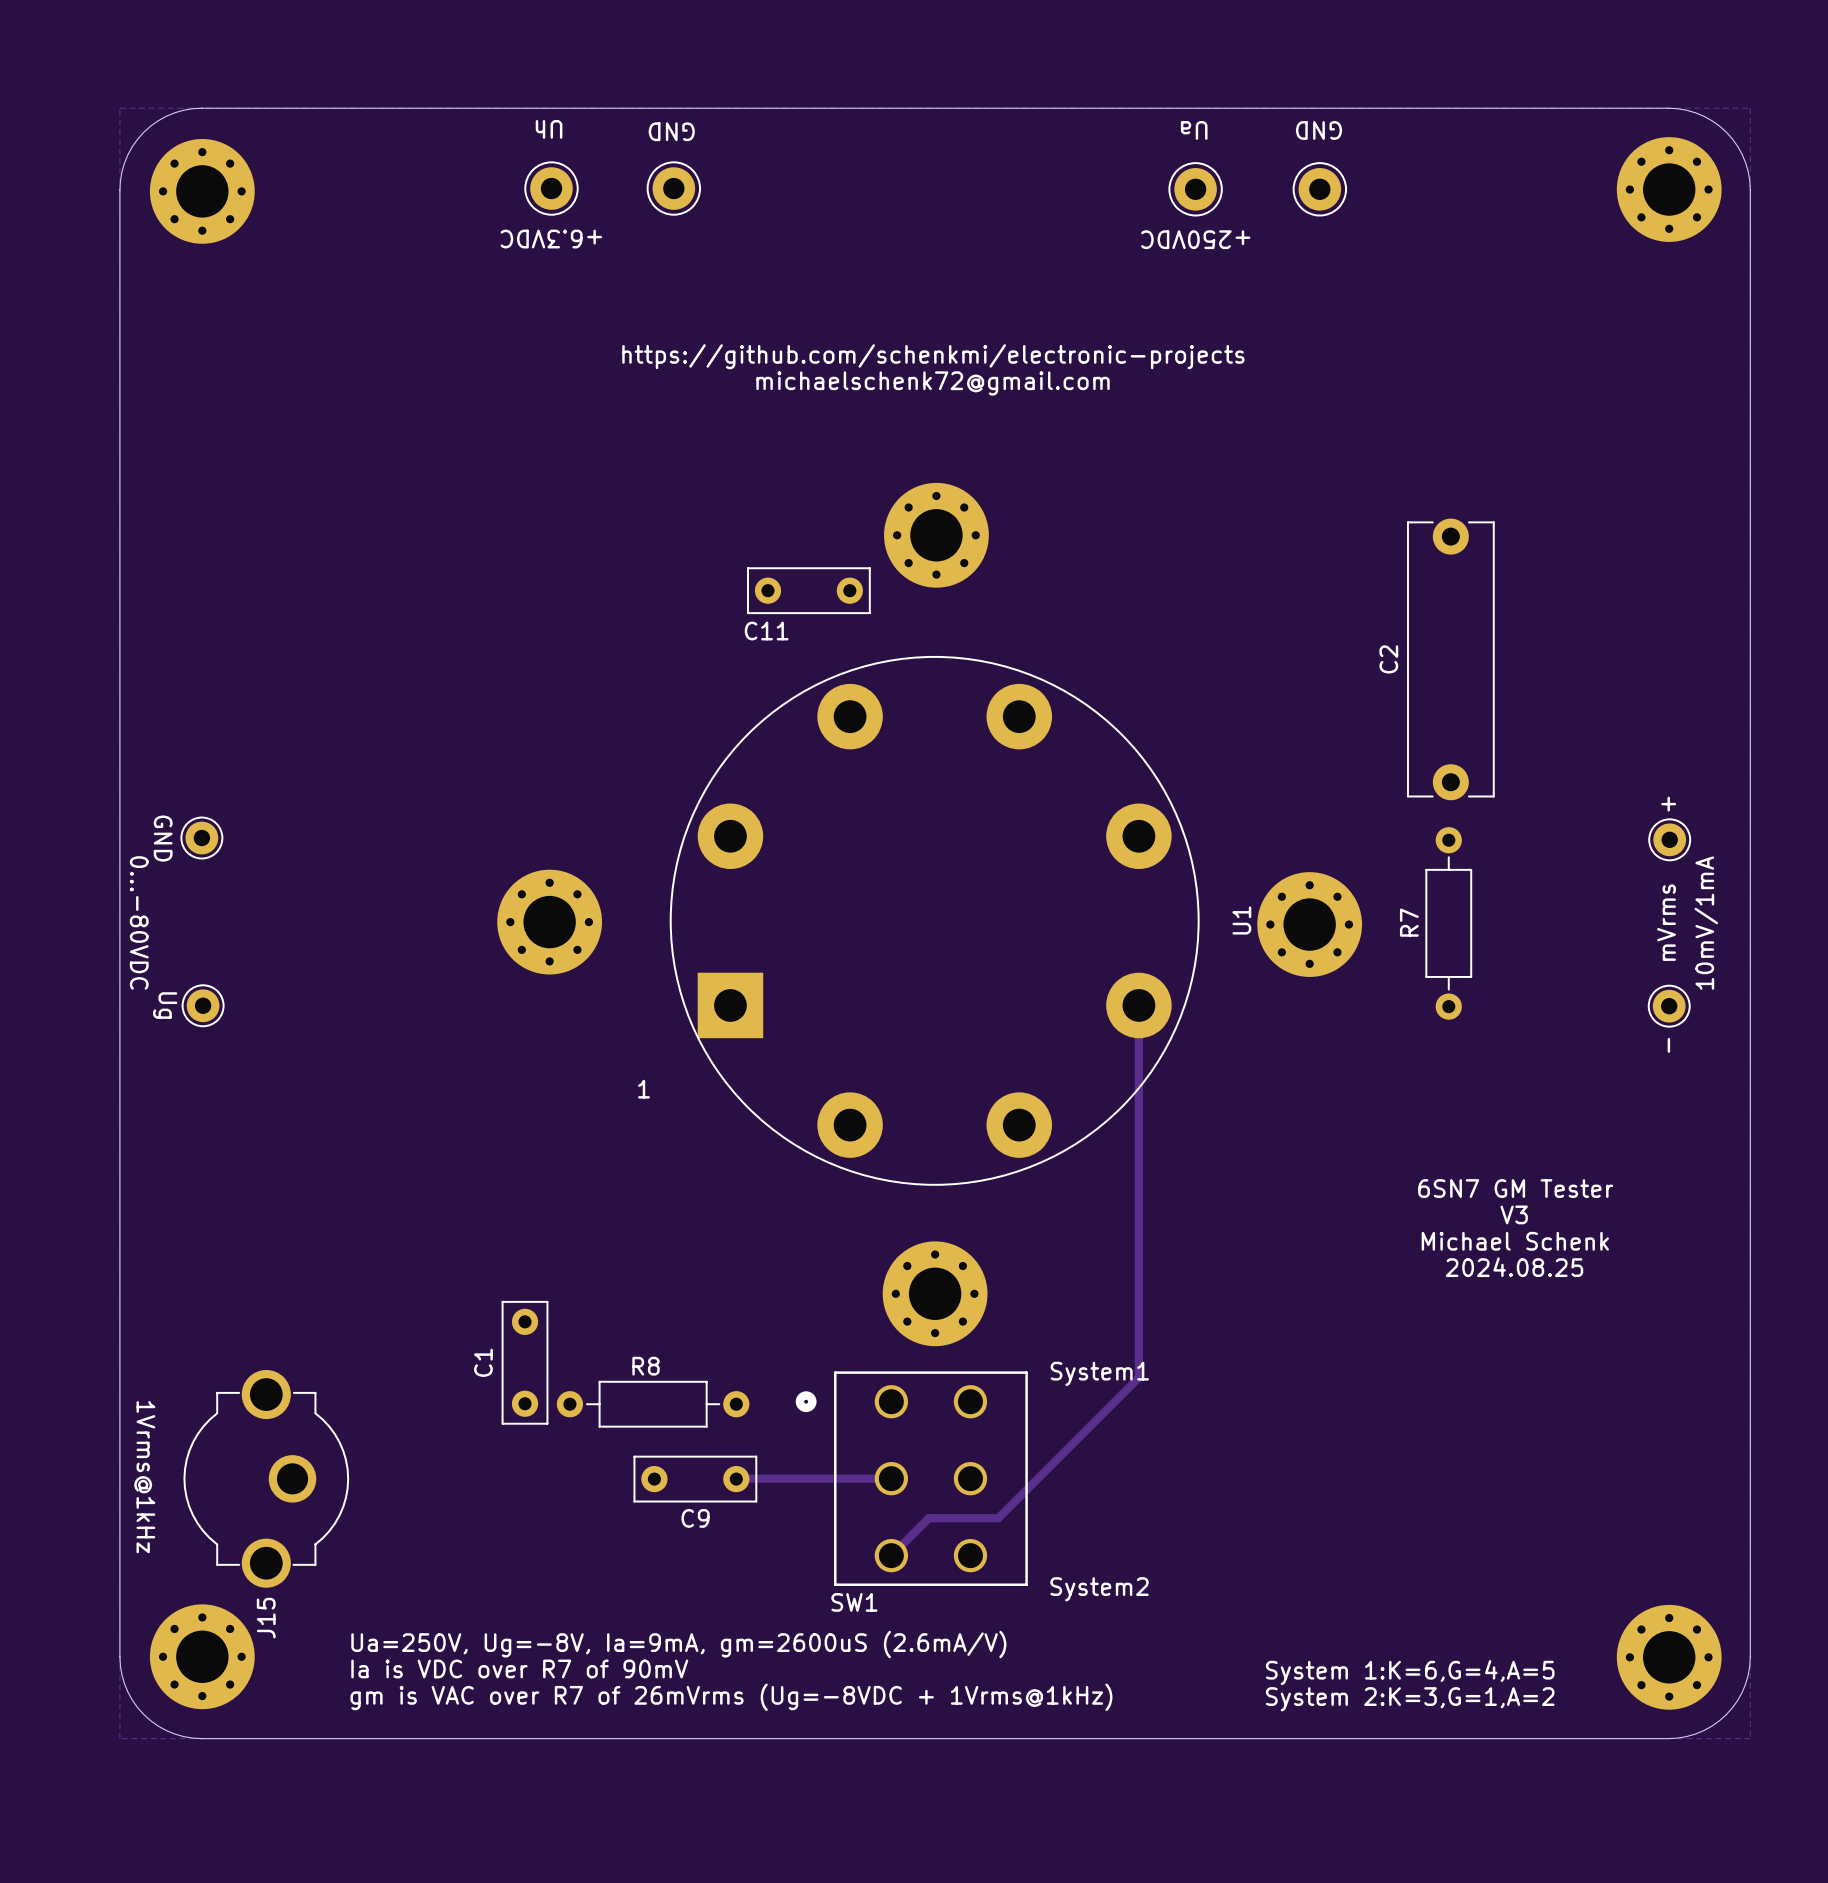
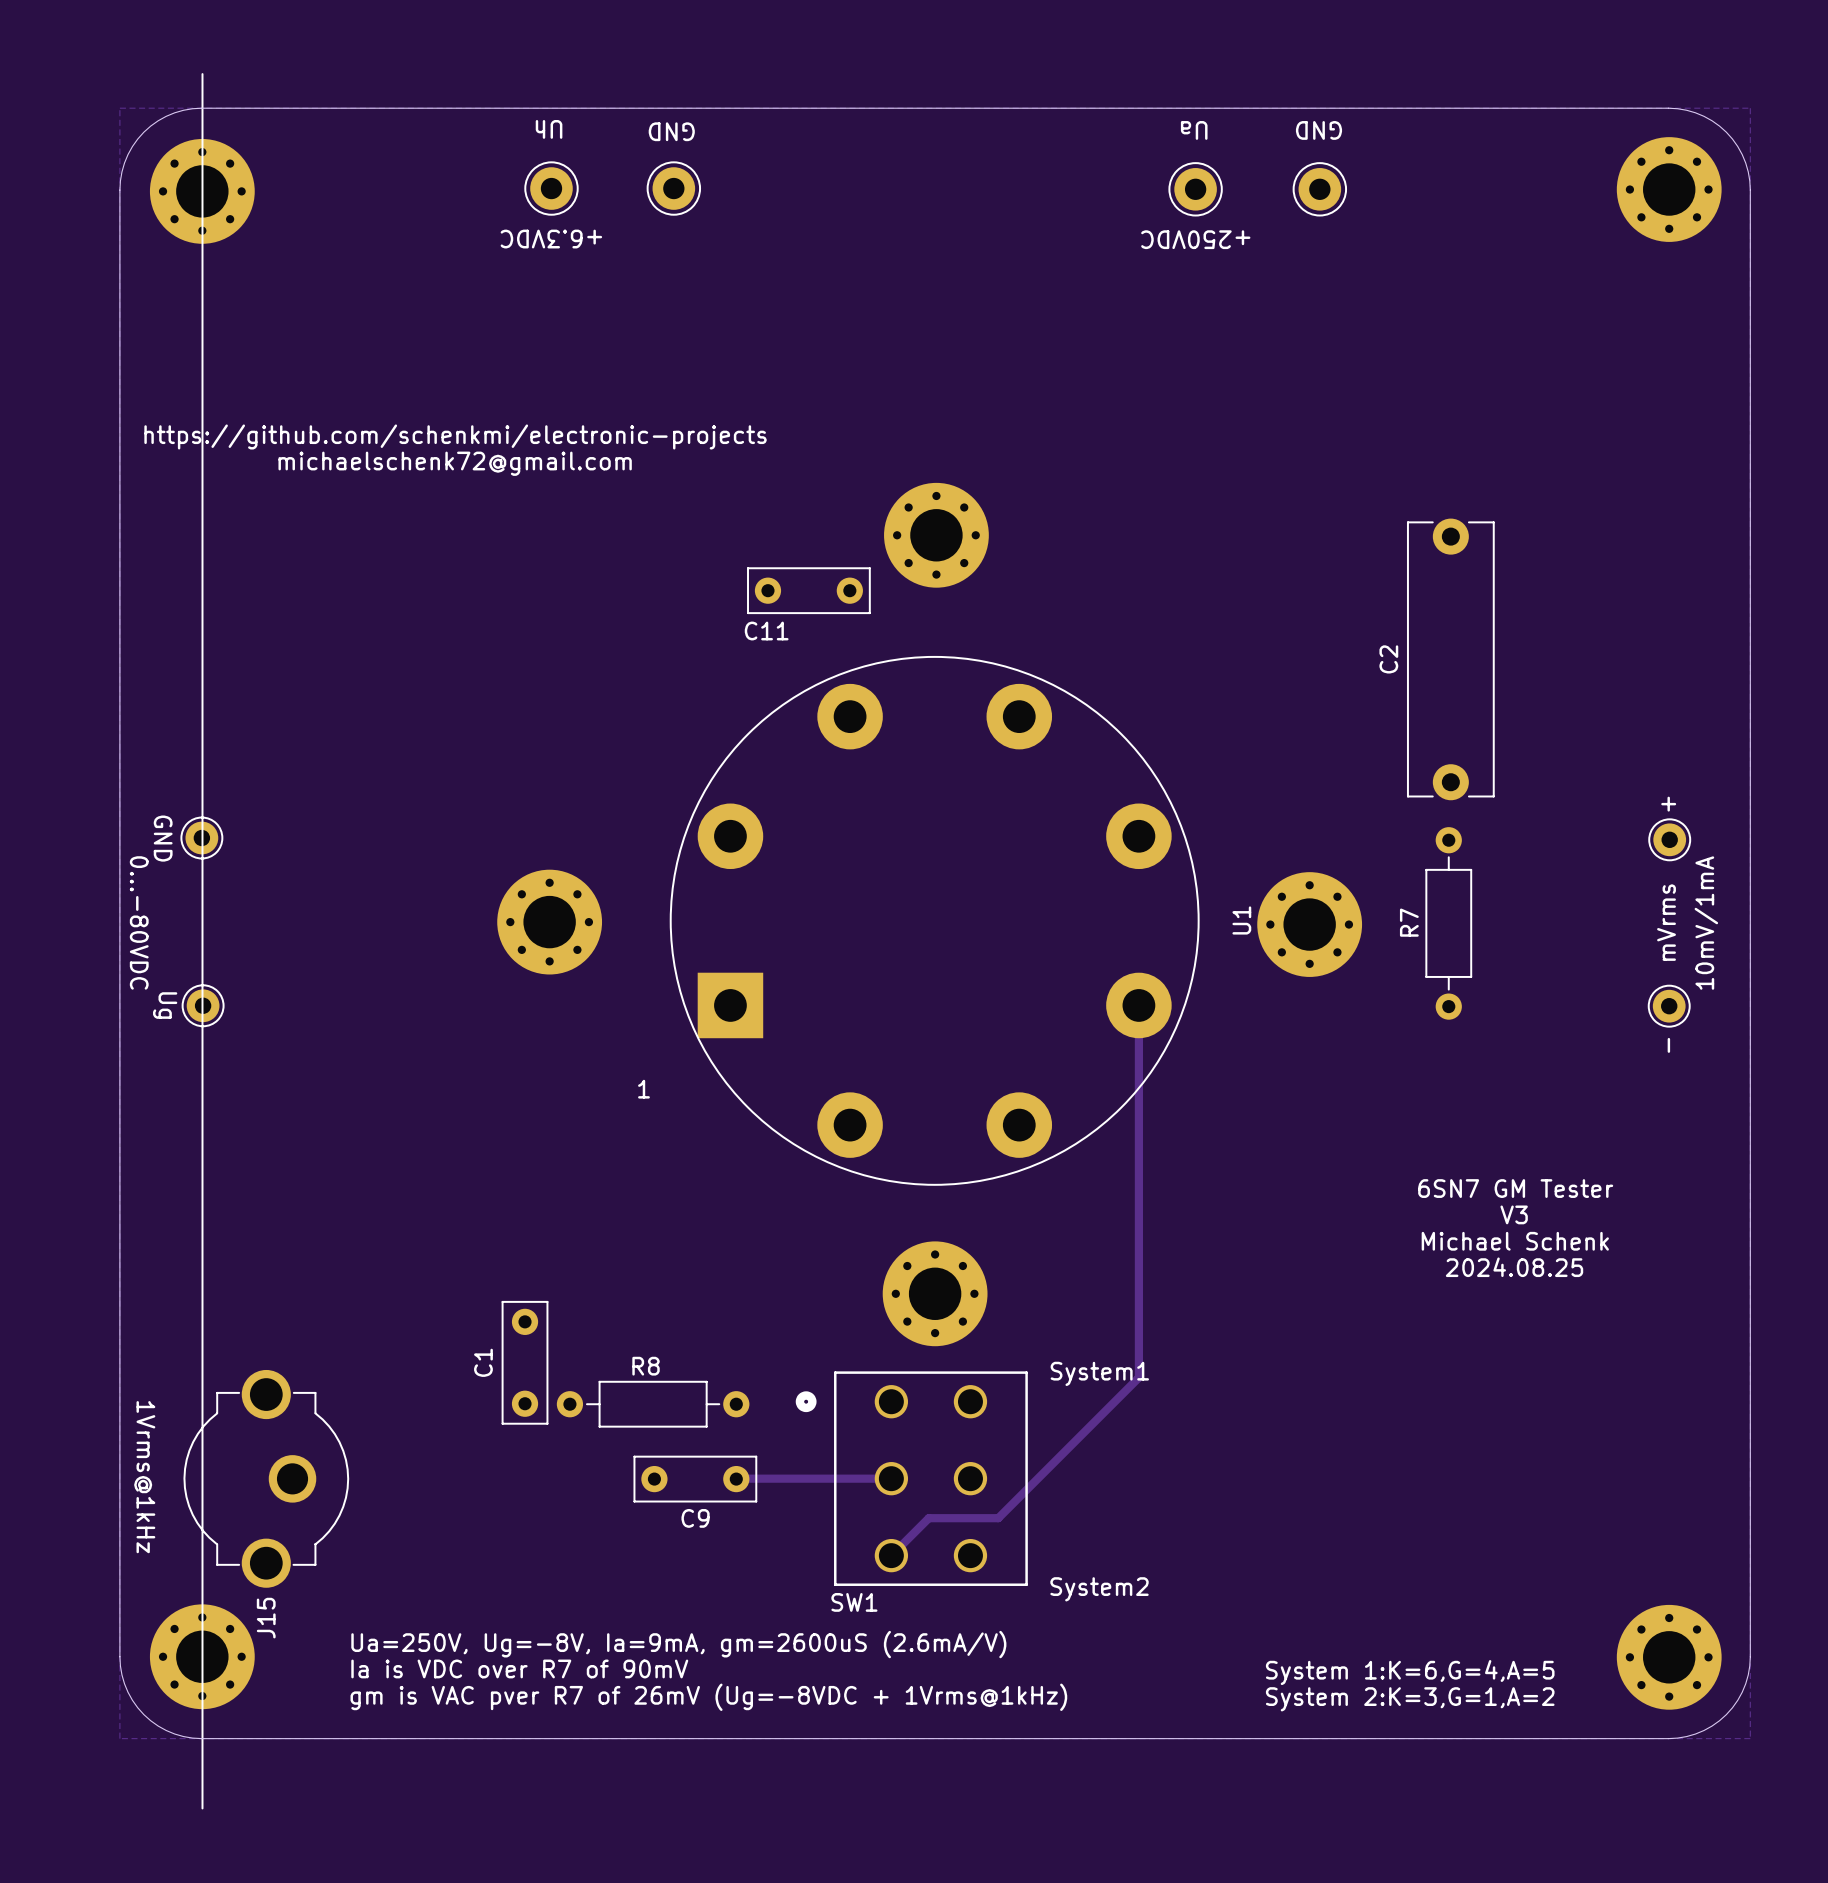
line: none -> (202, 74) (202, 1808)
text: https://github.com/schenkmi/electronic-projects (933, 356) -> none
text: michaelschenk72@gmail.com (933, 383) -> none
text: none -> https://github.com/schenkmi/electronic-projects (455, 436)
text: none -> michaelschenk72@gmail.com (455, 463)
text: gm is VAC over R7 of 26mVrms (Ug=-8VDC + 1Vrms@1kHz) (731, 1697) -> gm is VAC pver R7 of 26mV (Ug=-8VDC + 1Vrms@1kHz) (708, 1697)

